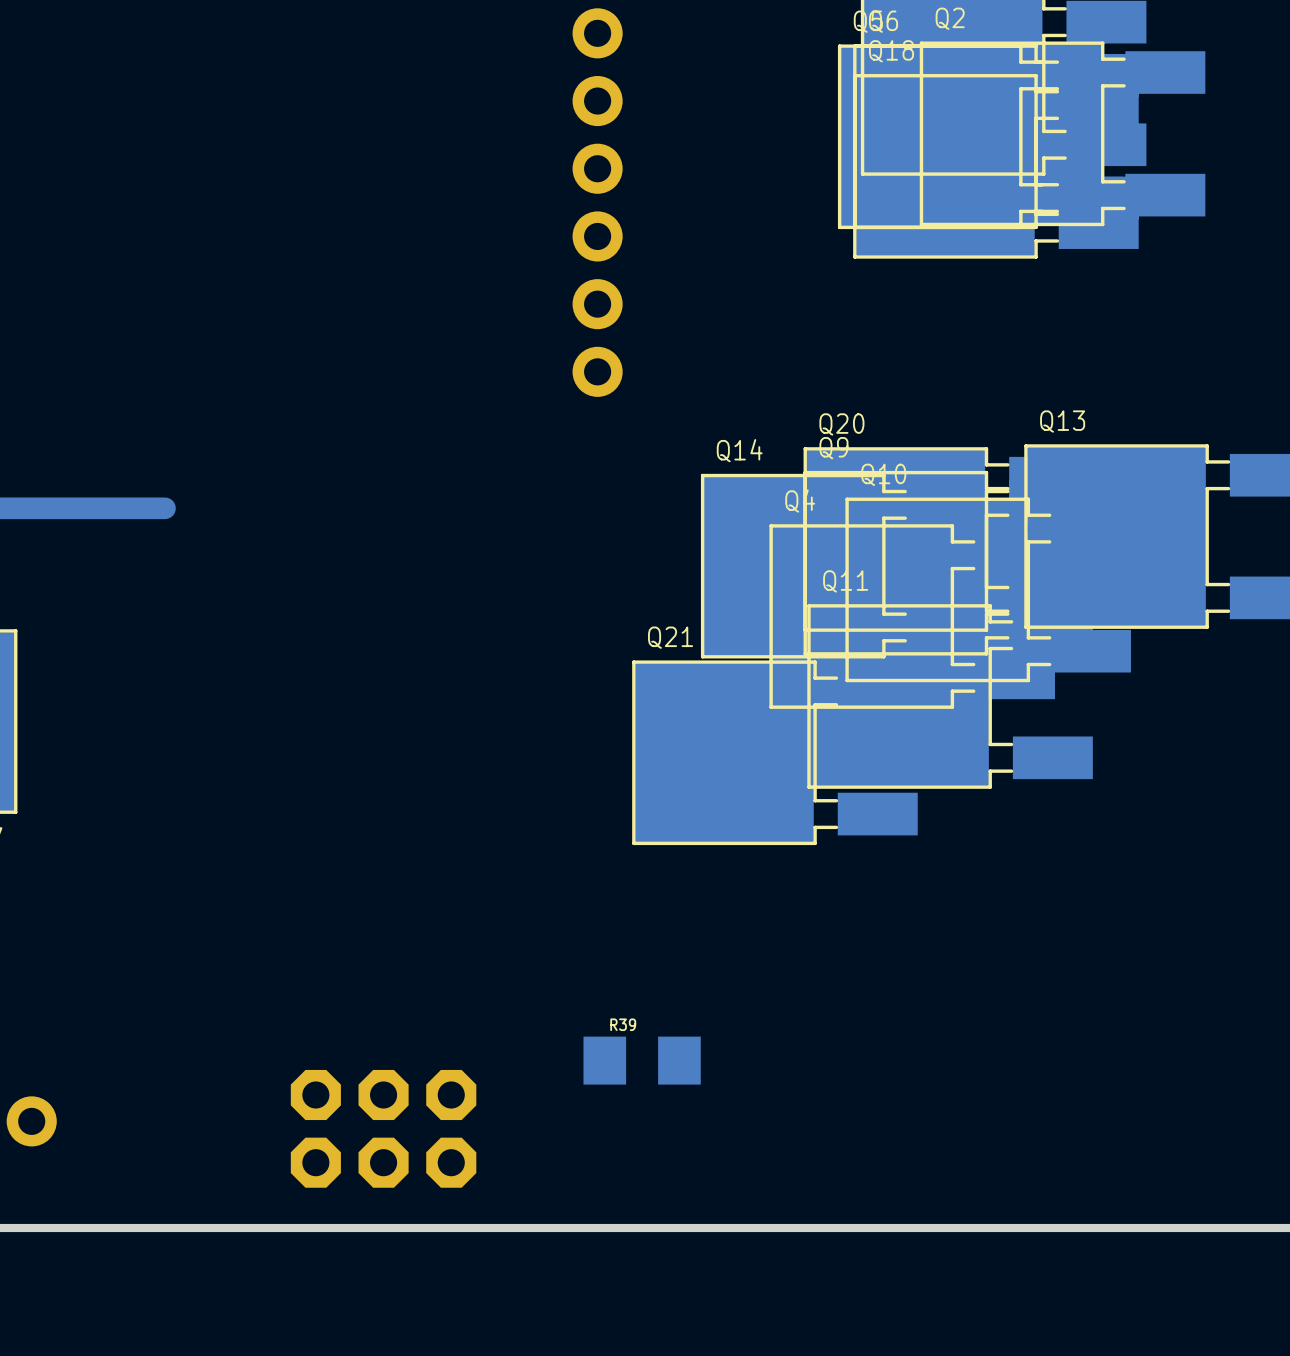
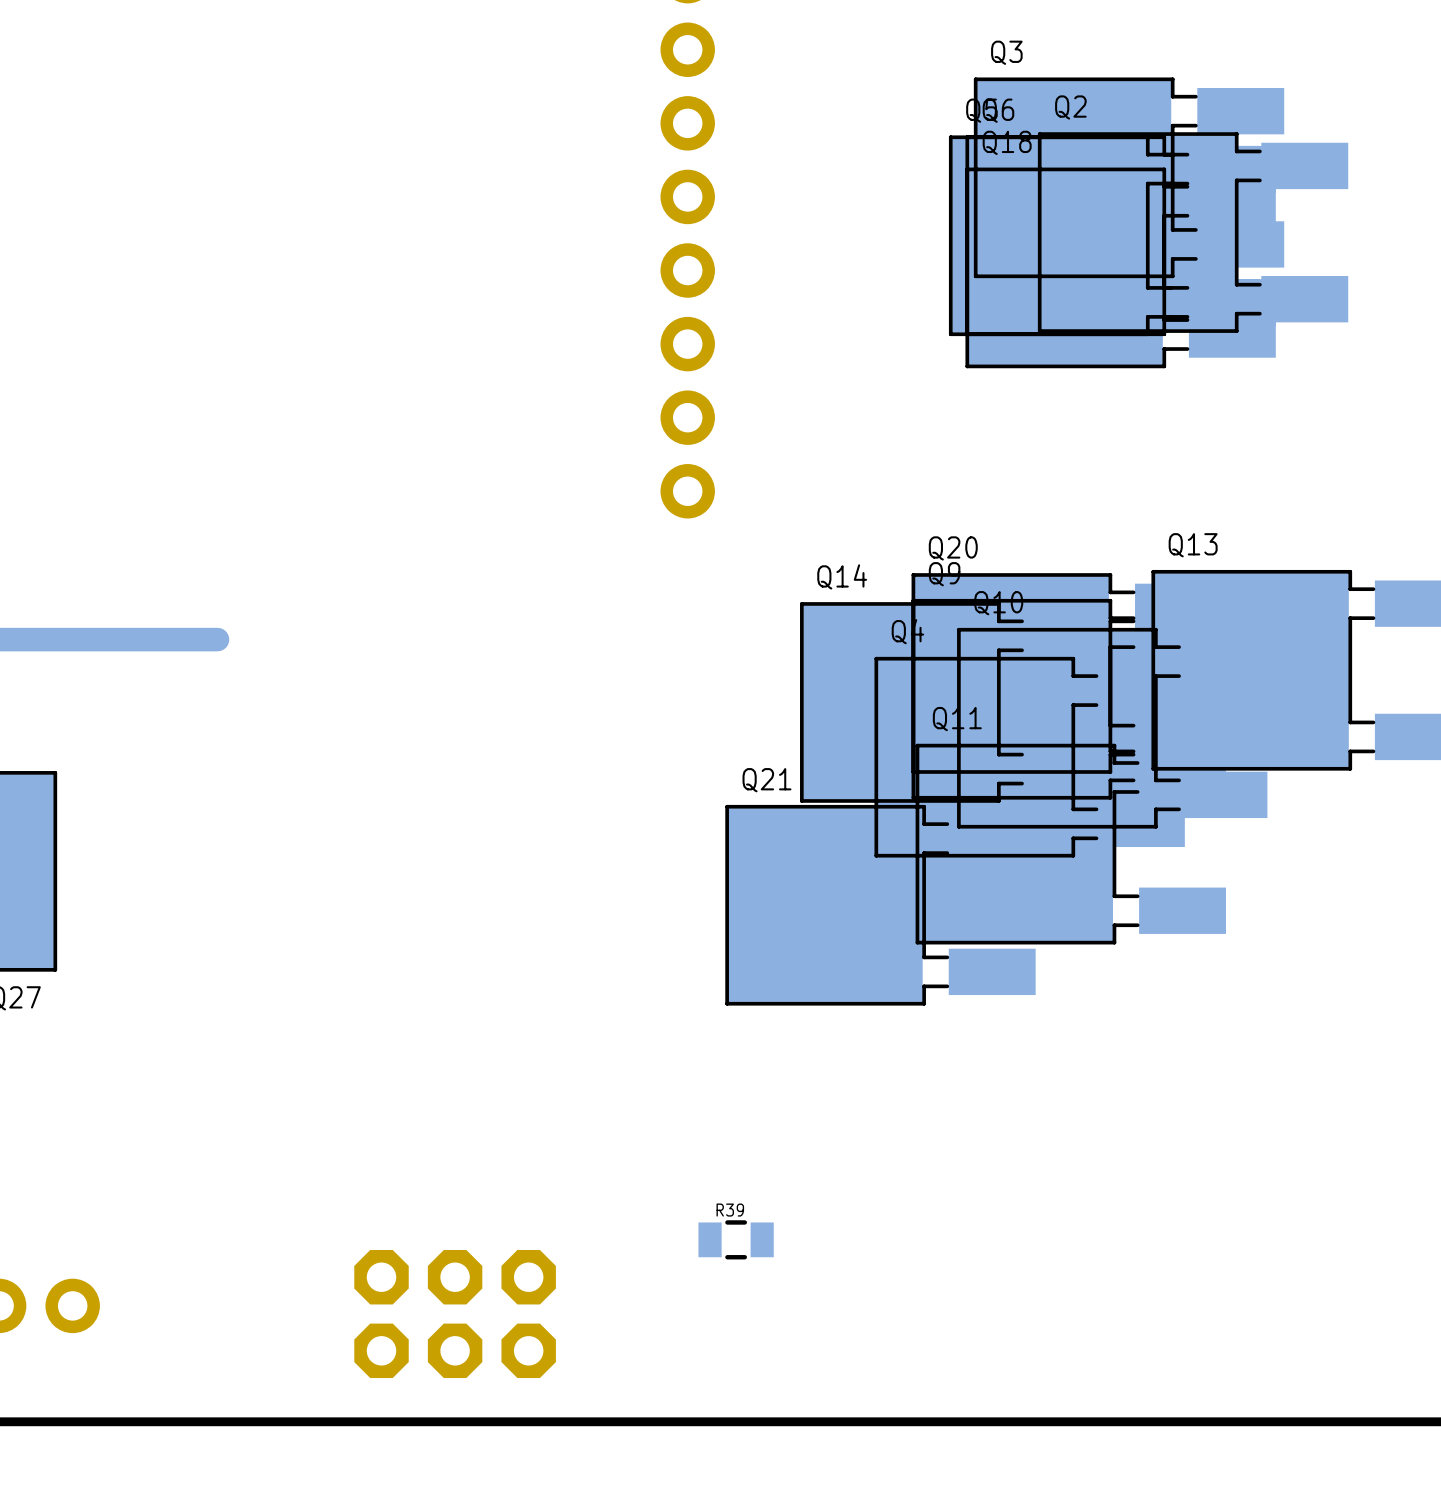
R39 footprint: [583, 1036, 701, 1085] -> [698, 1220, 774, 1260]

